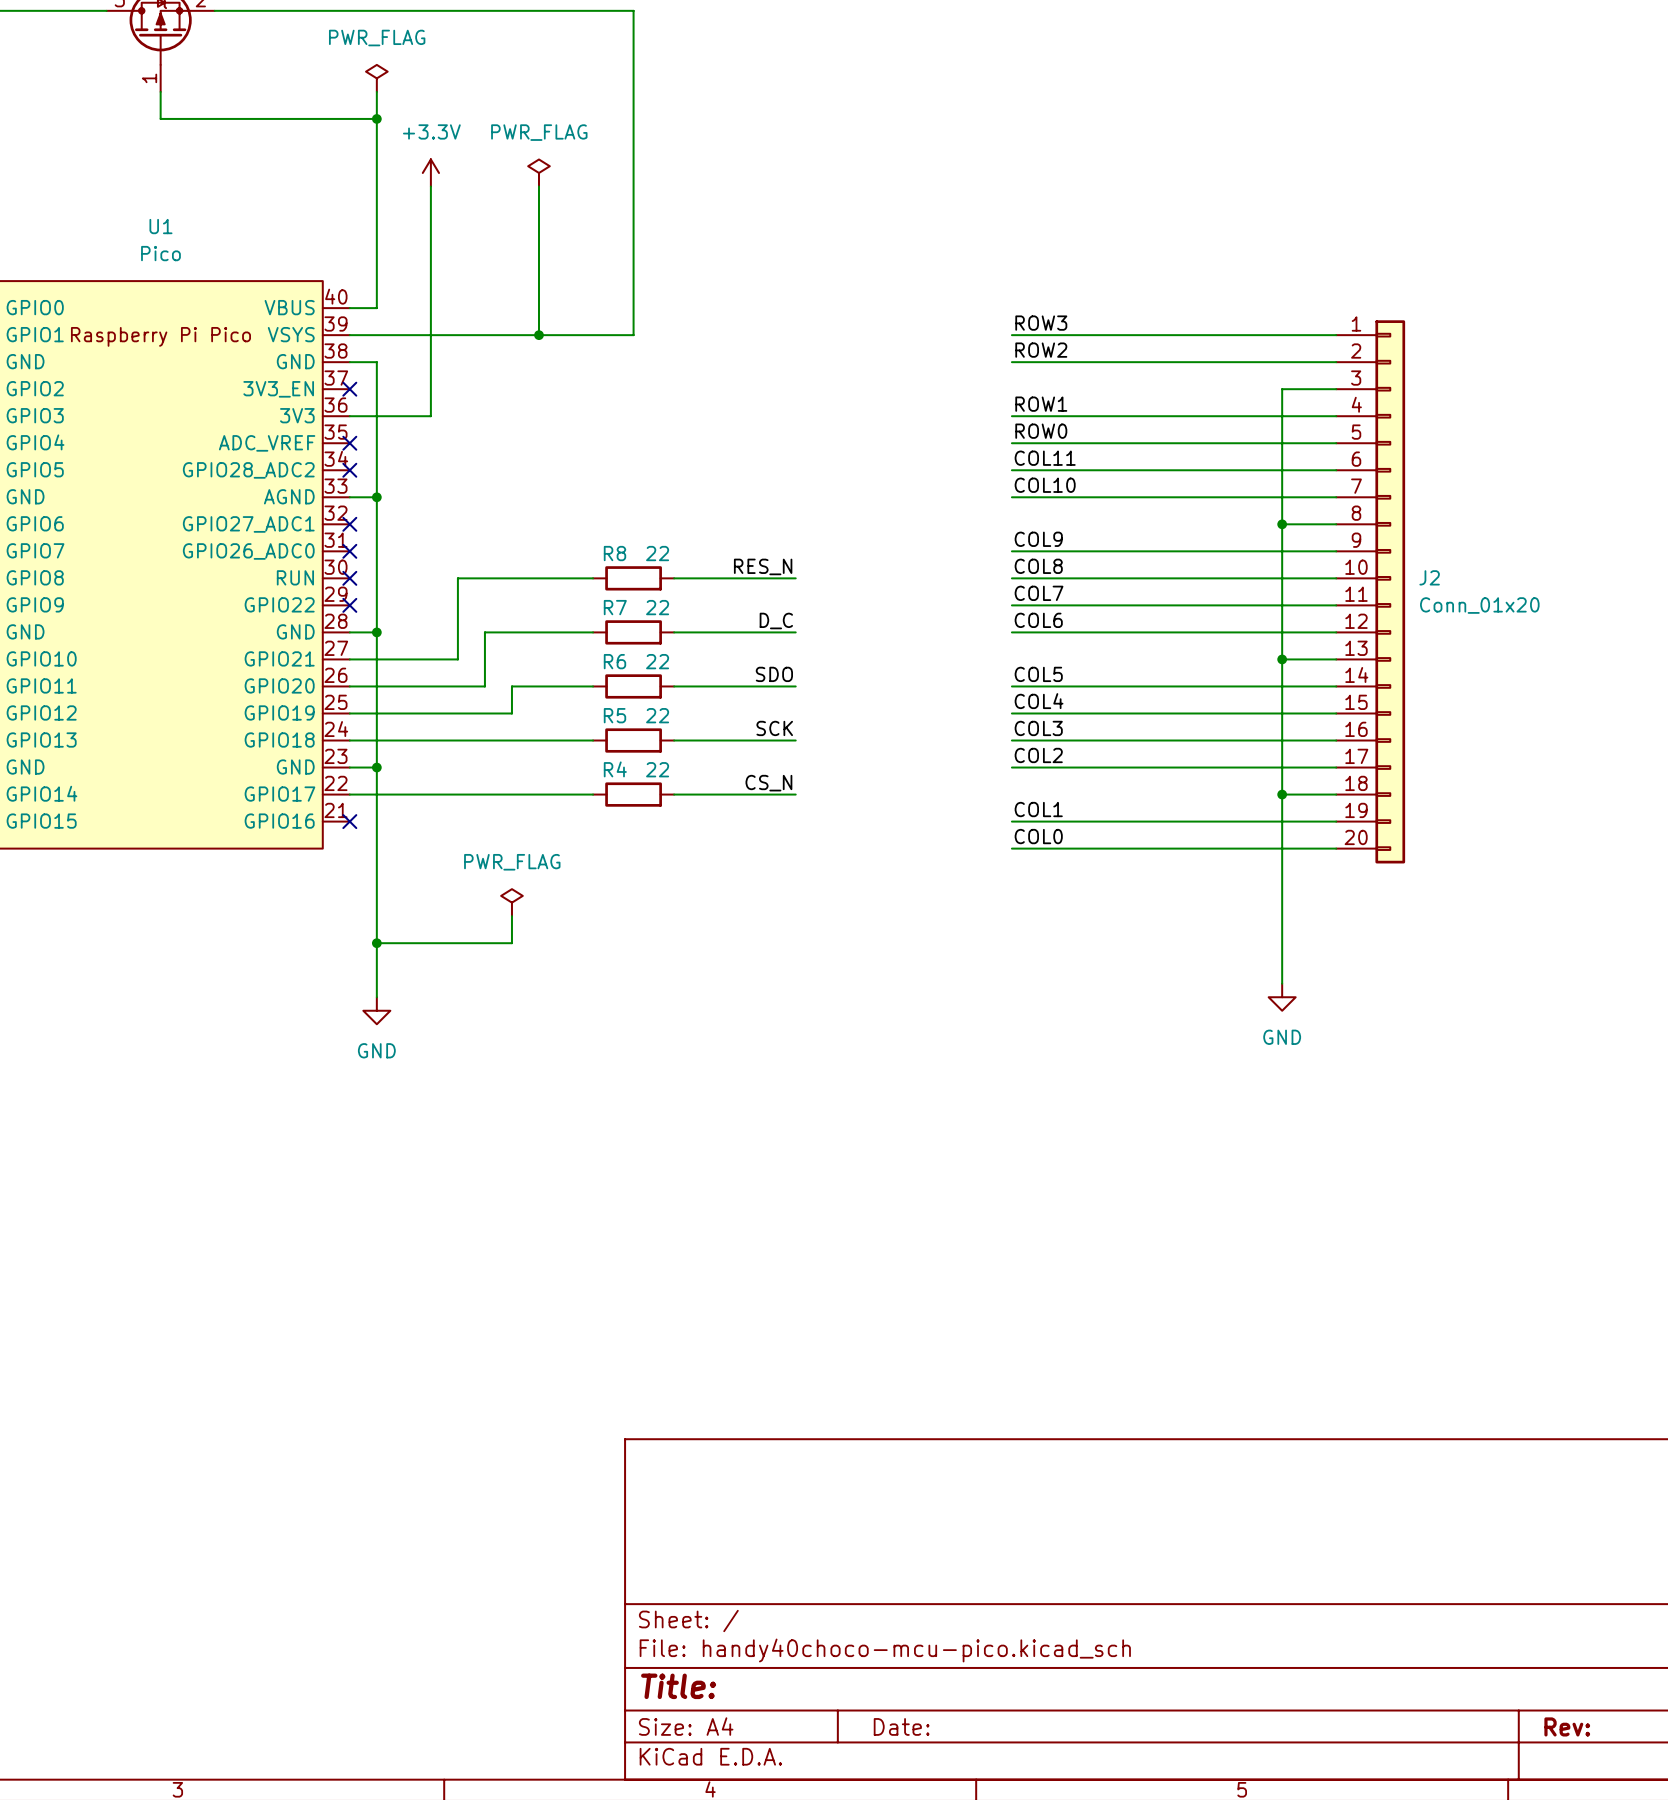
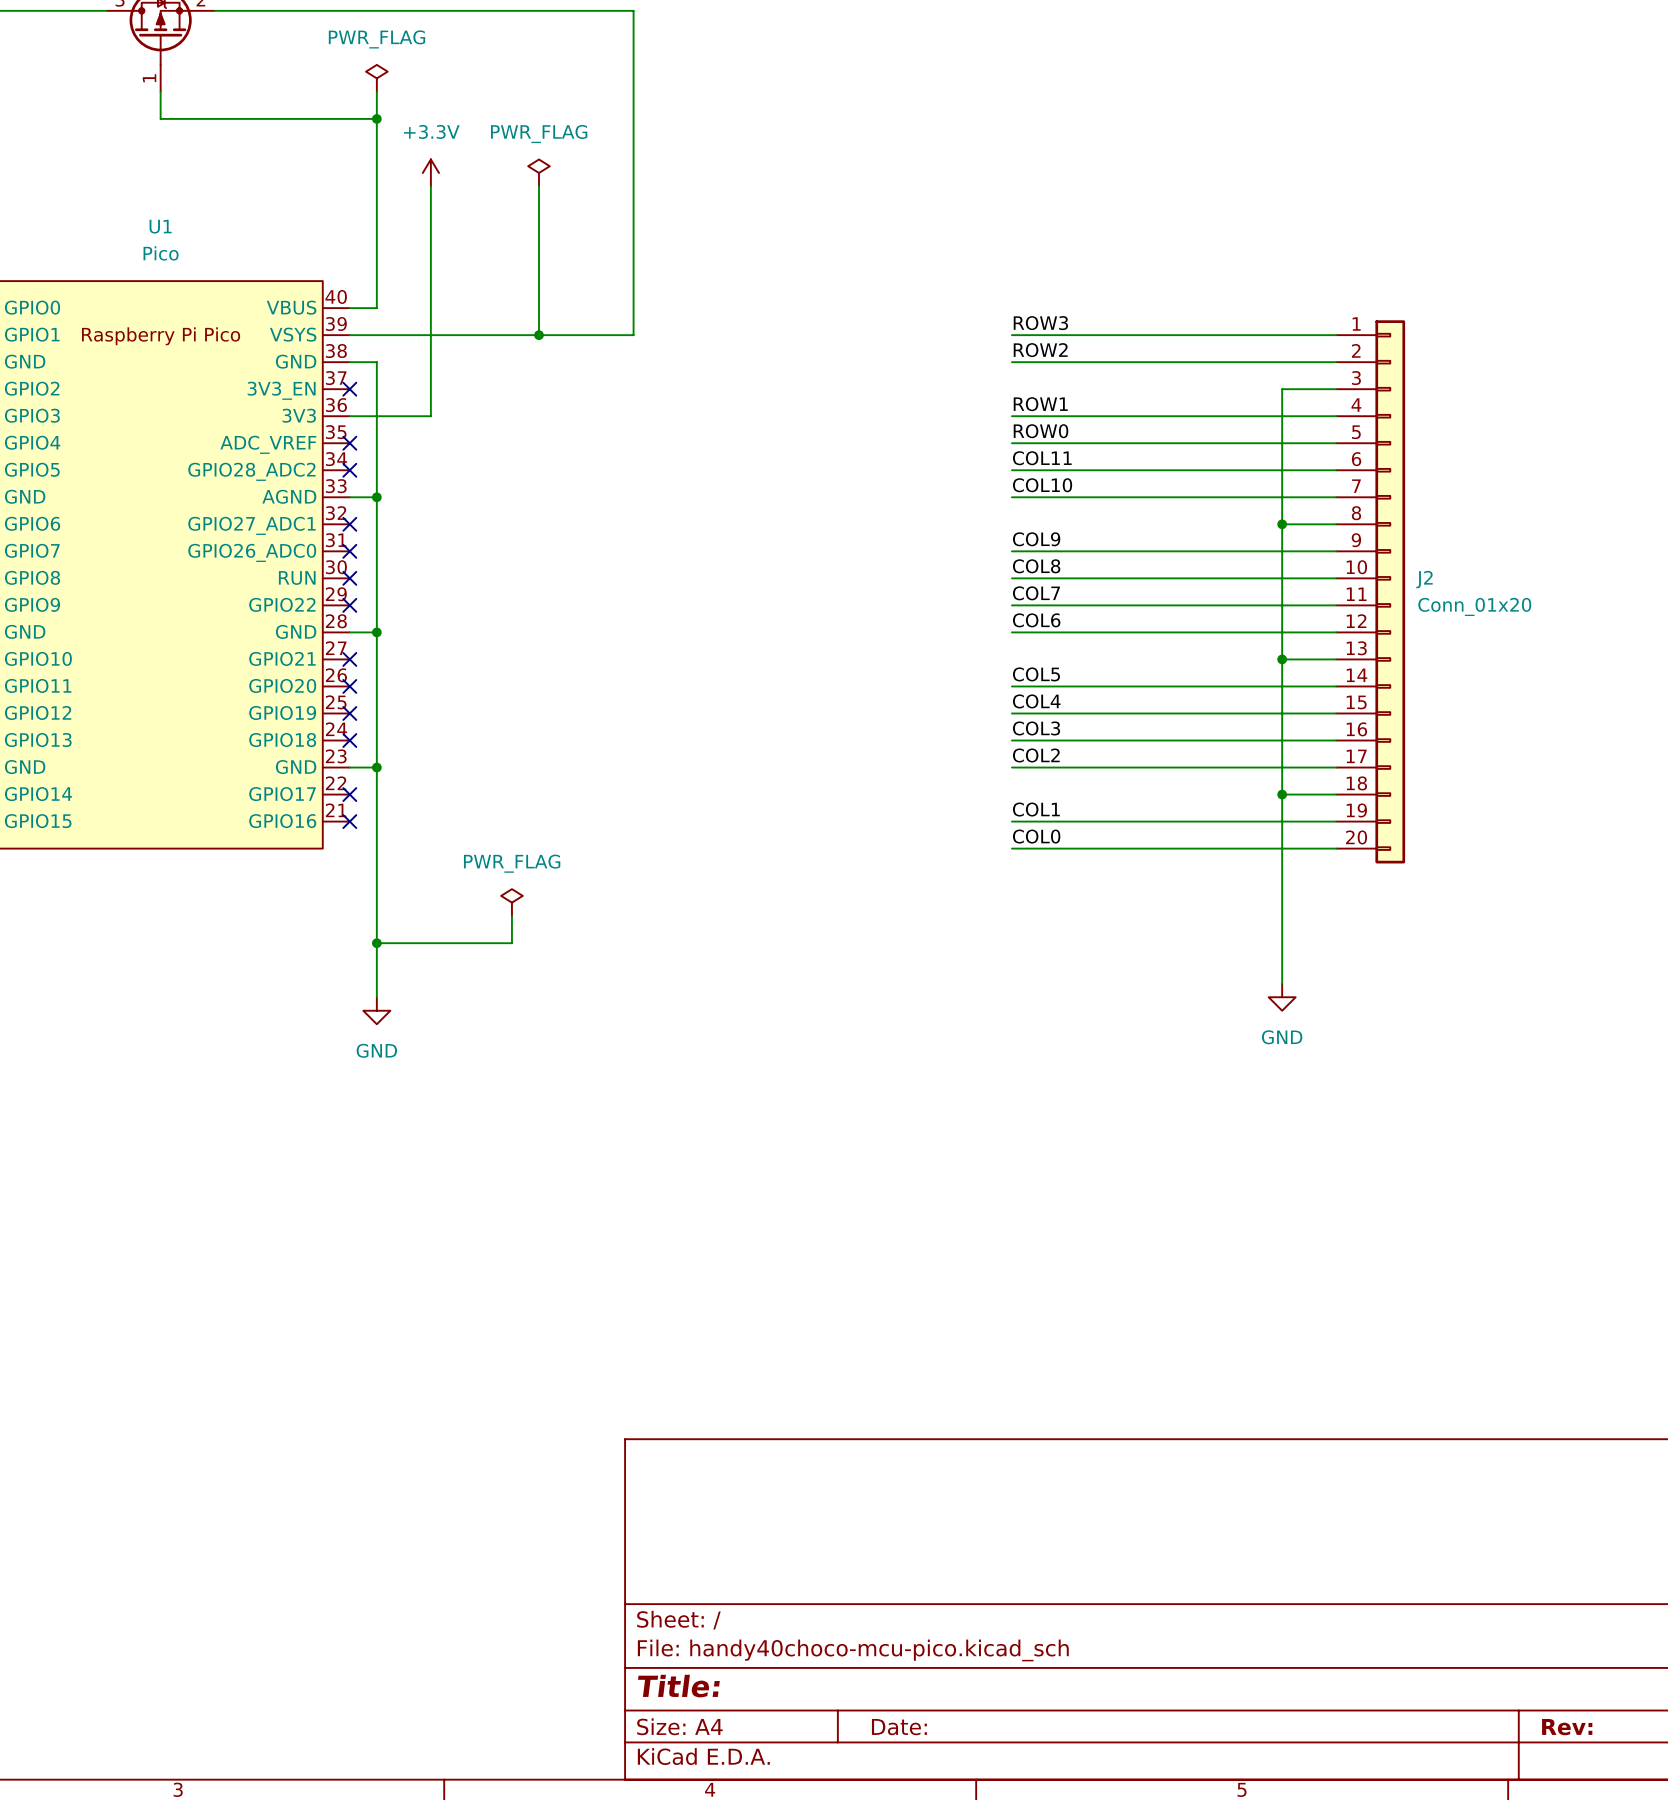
label: RES_N (763, 566) -> none
wire: (593, 578) (457, 578) (457, 659) (349, 659) -> none
R8: 22 (633, 578) -> none
wire: (674, 578) (795, 578) -> none
label: D_C (776, 620) -> none
wire: (593, 632) (484, 632) (484, 686) (349, 686) -> none
R7: 22 (633, 632) -> none
wire: (674, 632) (795, 632) -> none
no-connect mark: none -> (349, 659)
label: SDO (774, 674) -> none
no-connect mark: none -> (349, 686)
wire: (593, 686) (511, 686) (511, 713) (349, 713) -> none
R6: 22 (633, 686) -> none
wire: (674, 686) (795, 686) -> none
no-connect mark: none -> (349, 713)
label: SCK (774, 728) -> none
wire: (349, 740) (593, 740) -> none
no-connect mark: none -> (349, 740)
R5: 22 (633, 740) -> none
wire: (674, 740) (795, 740) -> none
label: CS_N (768, 783) -> none
wire: (349, 794) (593, 794) -> none
no-connect mark: none -> (349, 794)
R4: 22 (633, 794) -> none
wire: (674, 794) (795, 794) -> none

